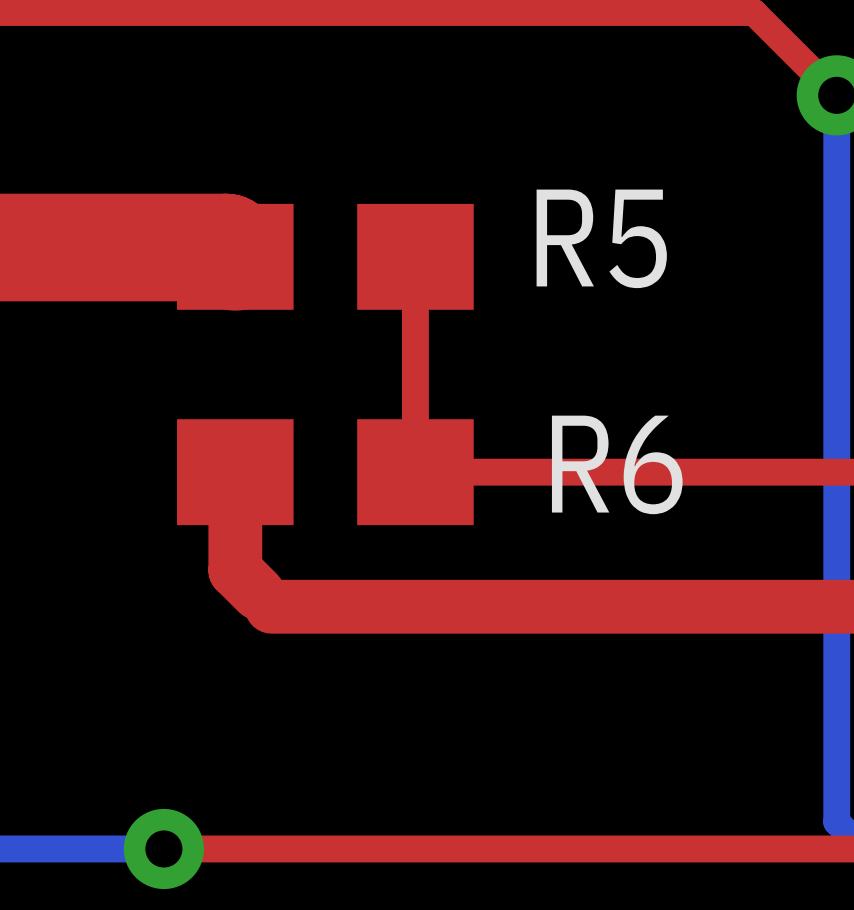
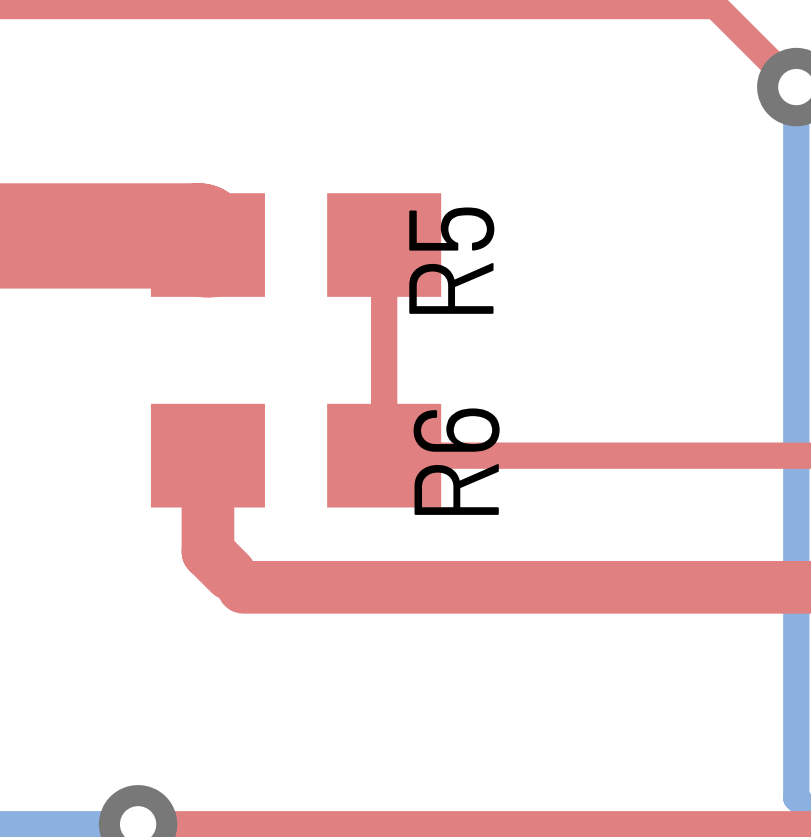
R5 name rotation: 0° (601, 238) -> 90° counterclockwise (451, 260)
R6 name rotation: 0° (617, 464) -> 90° counterclockwise (456, 461)

